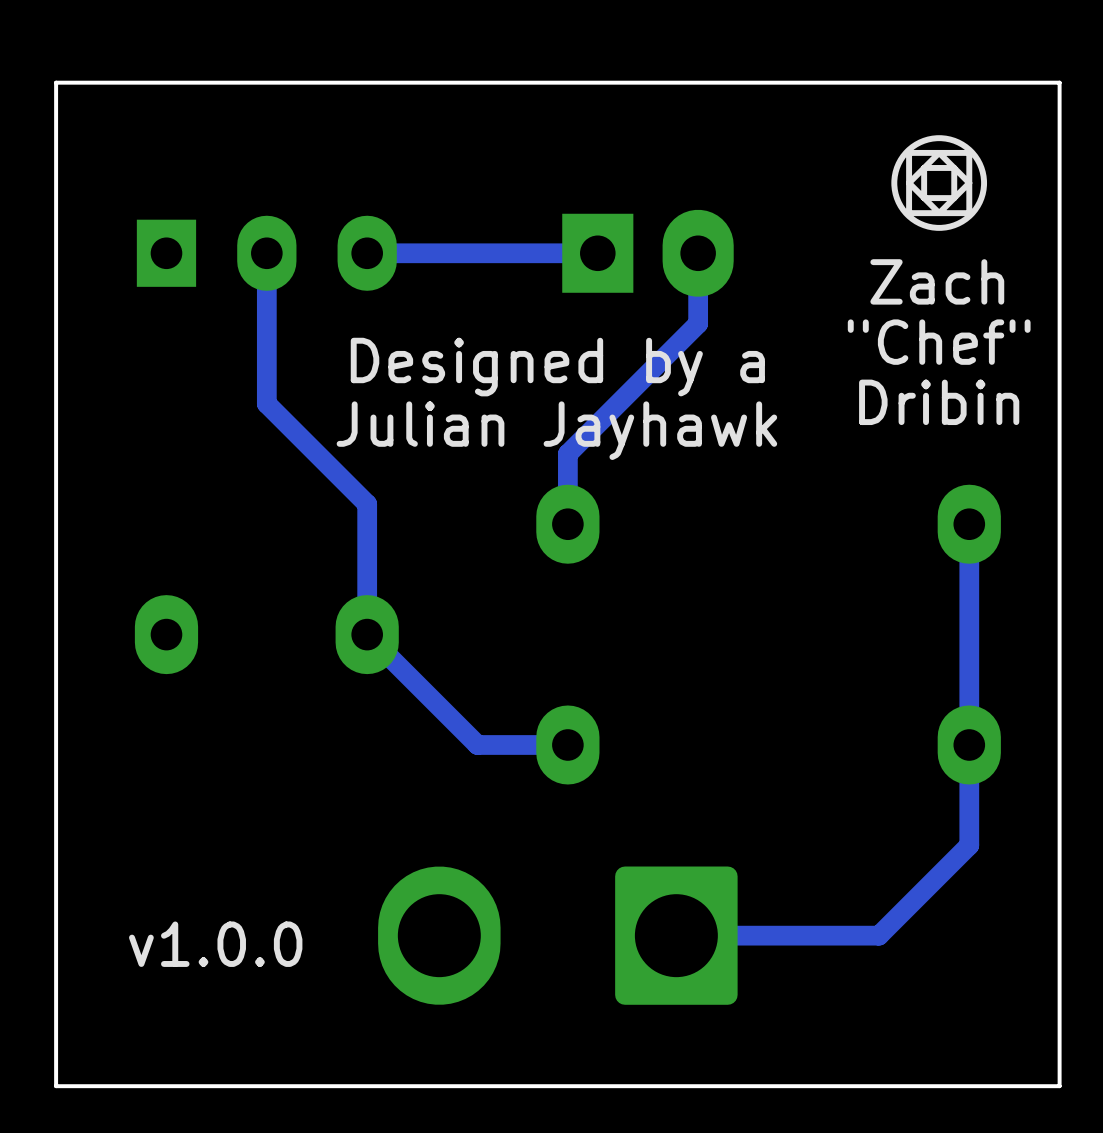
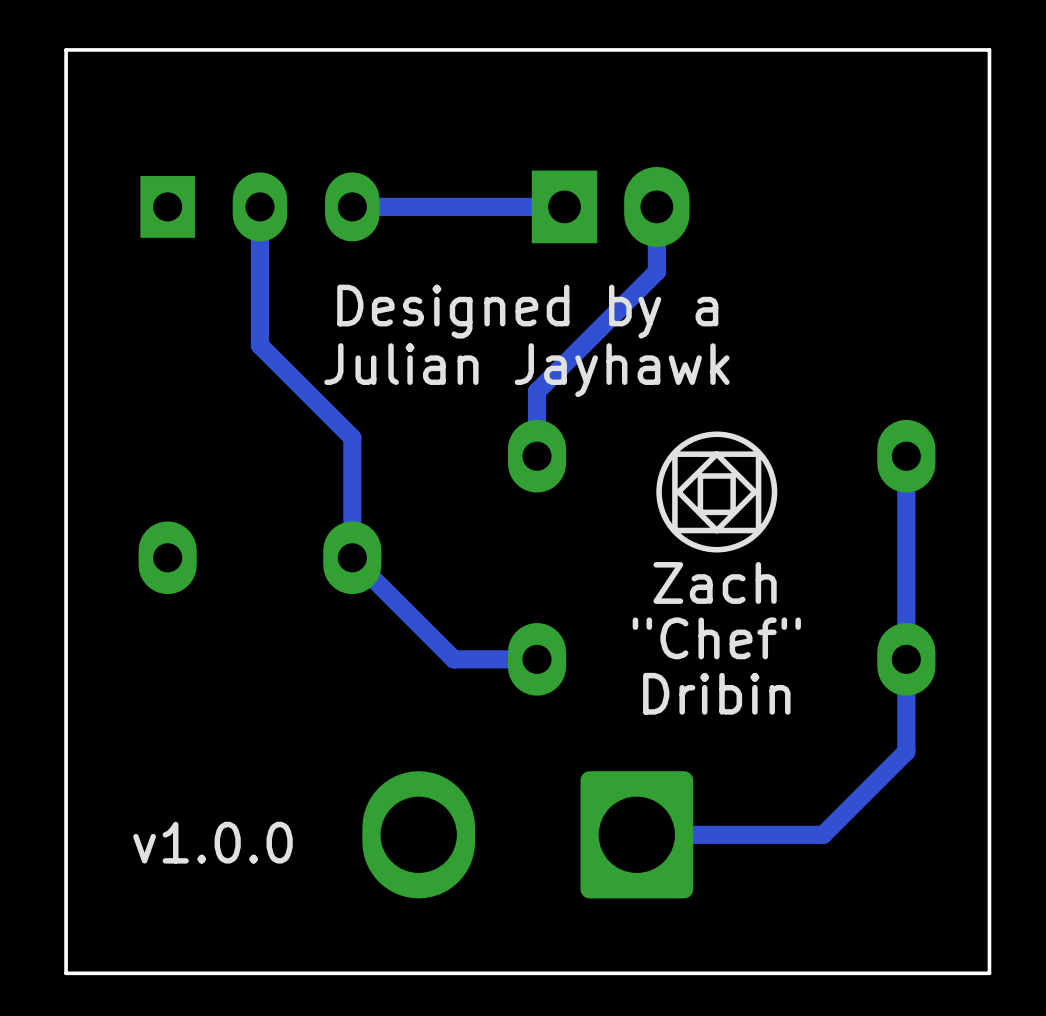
drawing: [891, 135, 988, 231] -> none
line: (939, 152) (969, 183) (939, 213) (909, 183) (939, 152) -> none
line: (969, 152) (969, 213) (909, 213) (909, 152) (969, 152) -> none
line: (954, 167) (924, 167) (924, 198) (954, 198) (954, 167) -> none
text position: Zach (937, 281) -> Zach (715, 582)
text position: "Chef" (939, 342) -> "Chef" (716, 638)
text position: Dribin (939, 402) -> Dribin (716, 693)
drawing: none -> [656, 431, 778, 553]
line: none -> (716, 454) (754, 491) (716, 530) (678, 491) (716, 454)
line: none -> (758, 454) (758, 530) (674, 530) (674, 454) (758, 454)
line: none -> (733, 475) (700, 475) (700, 512) (733, 512) (733, 475)

